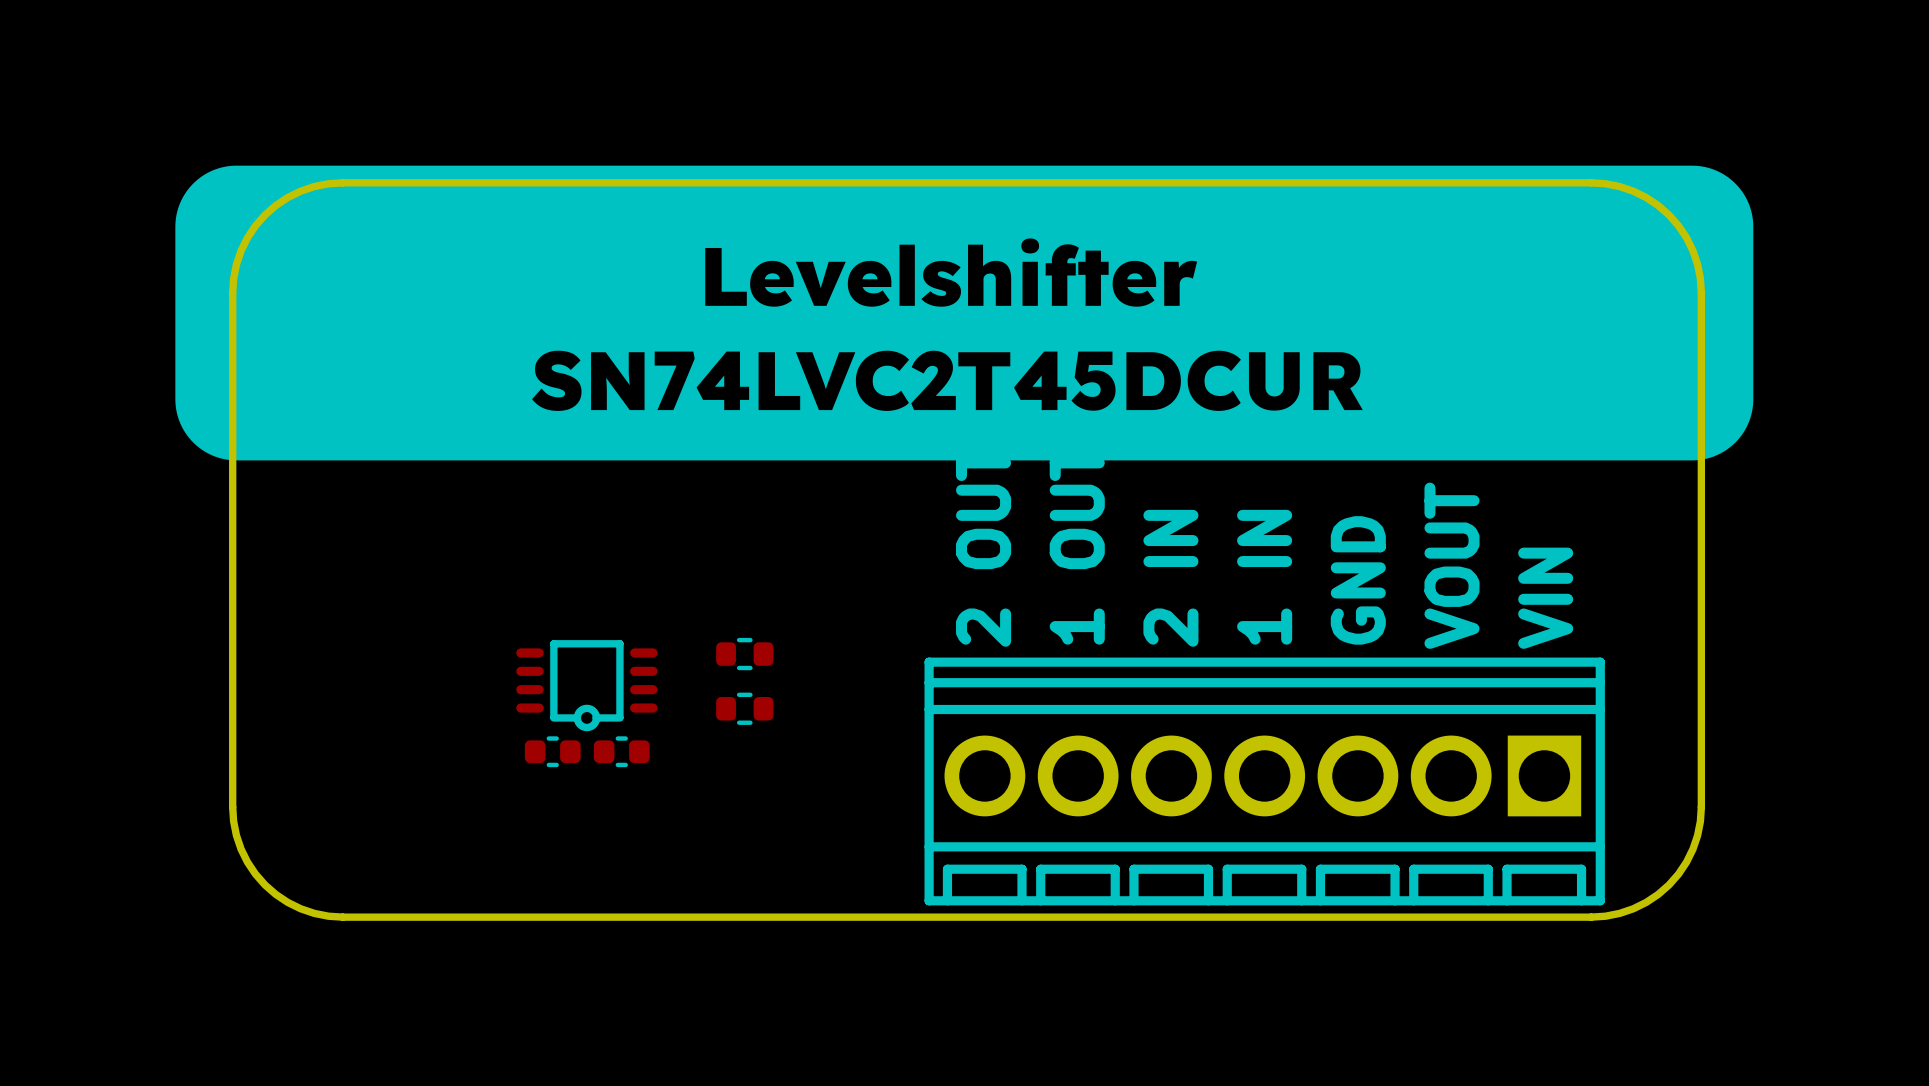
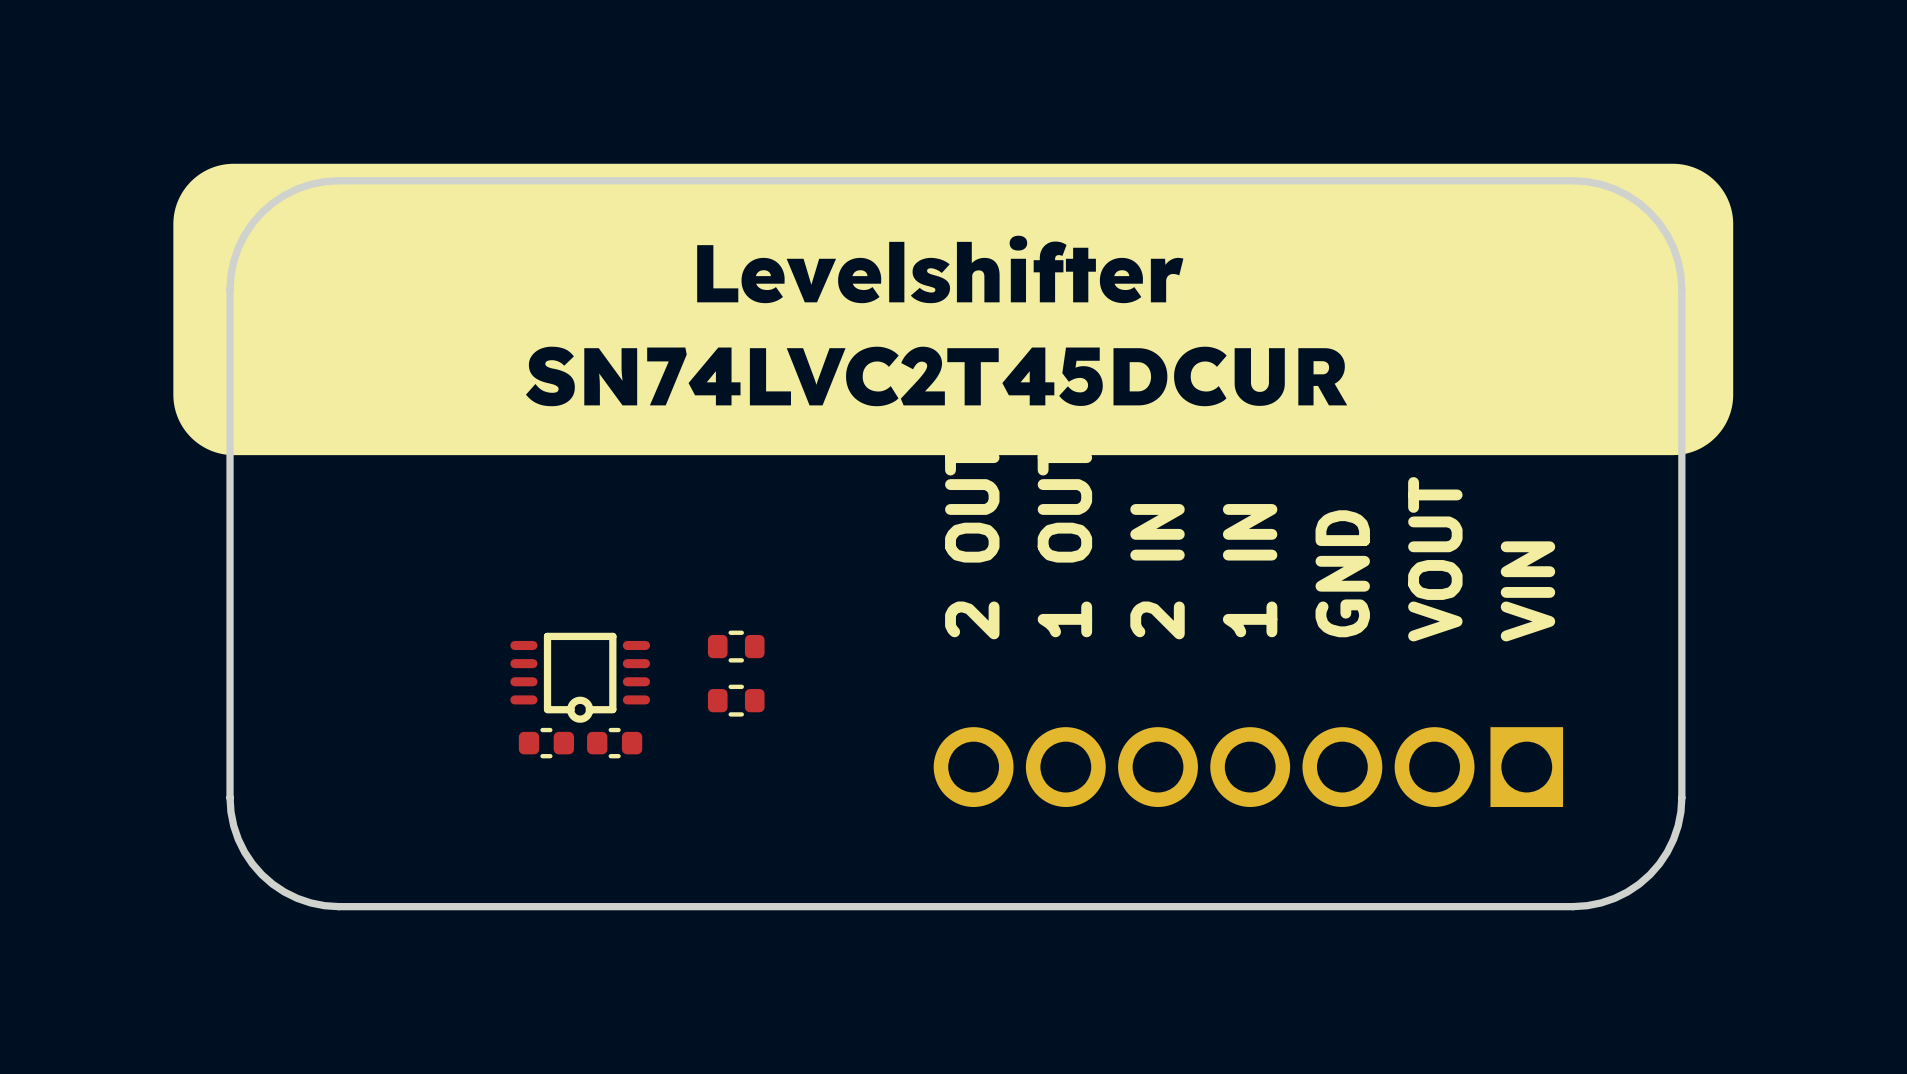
part footprint: [924, 657, 1605, 906] -> [933, 727, 1564, 807]

